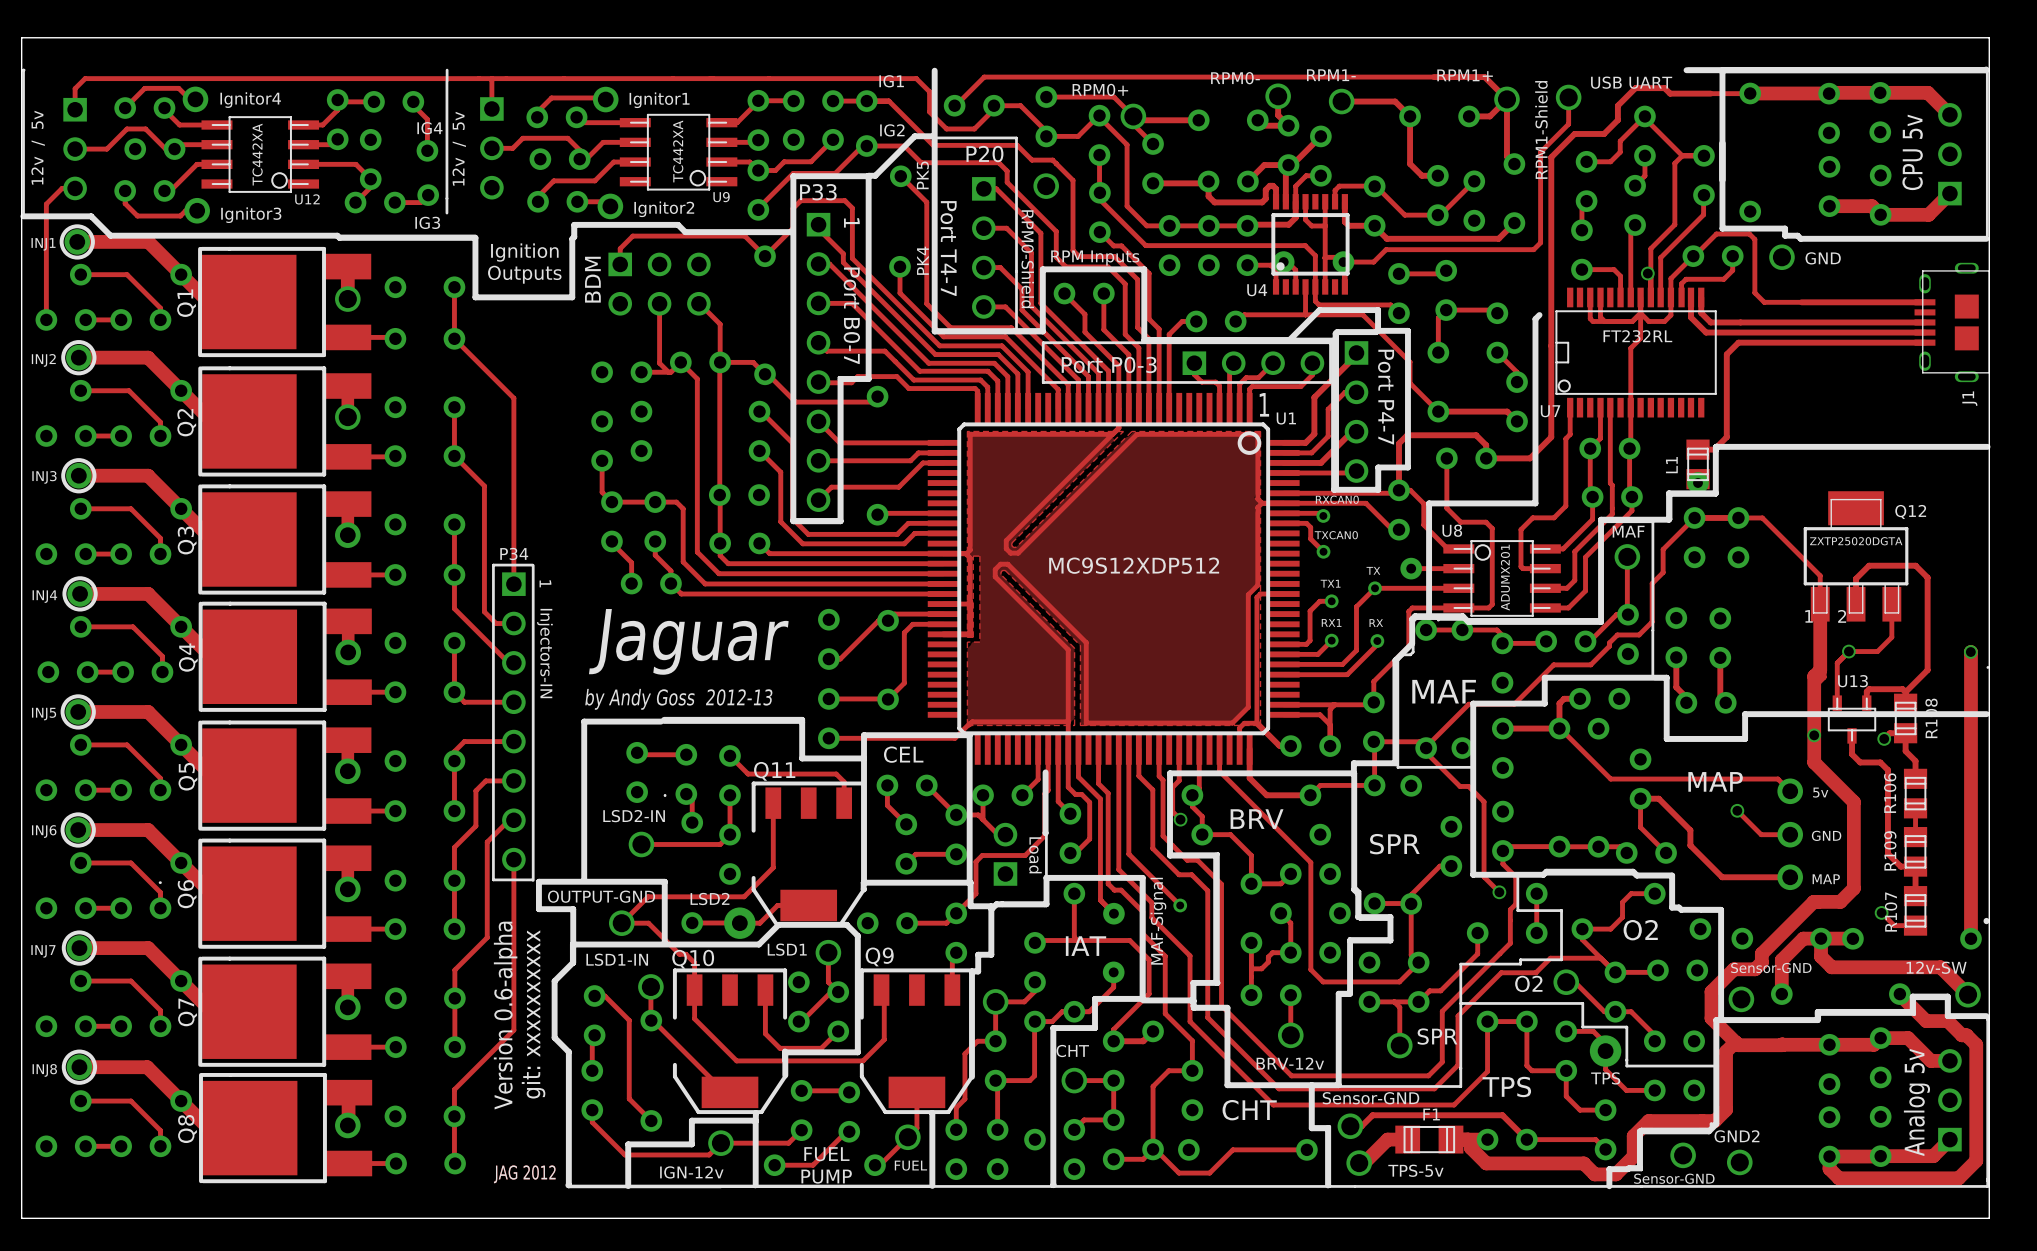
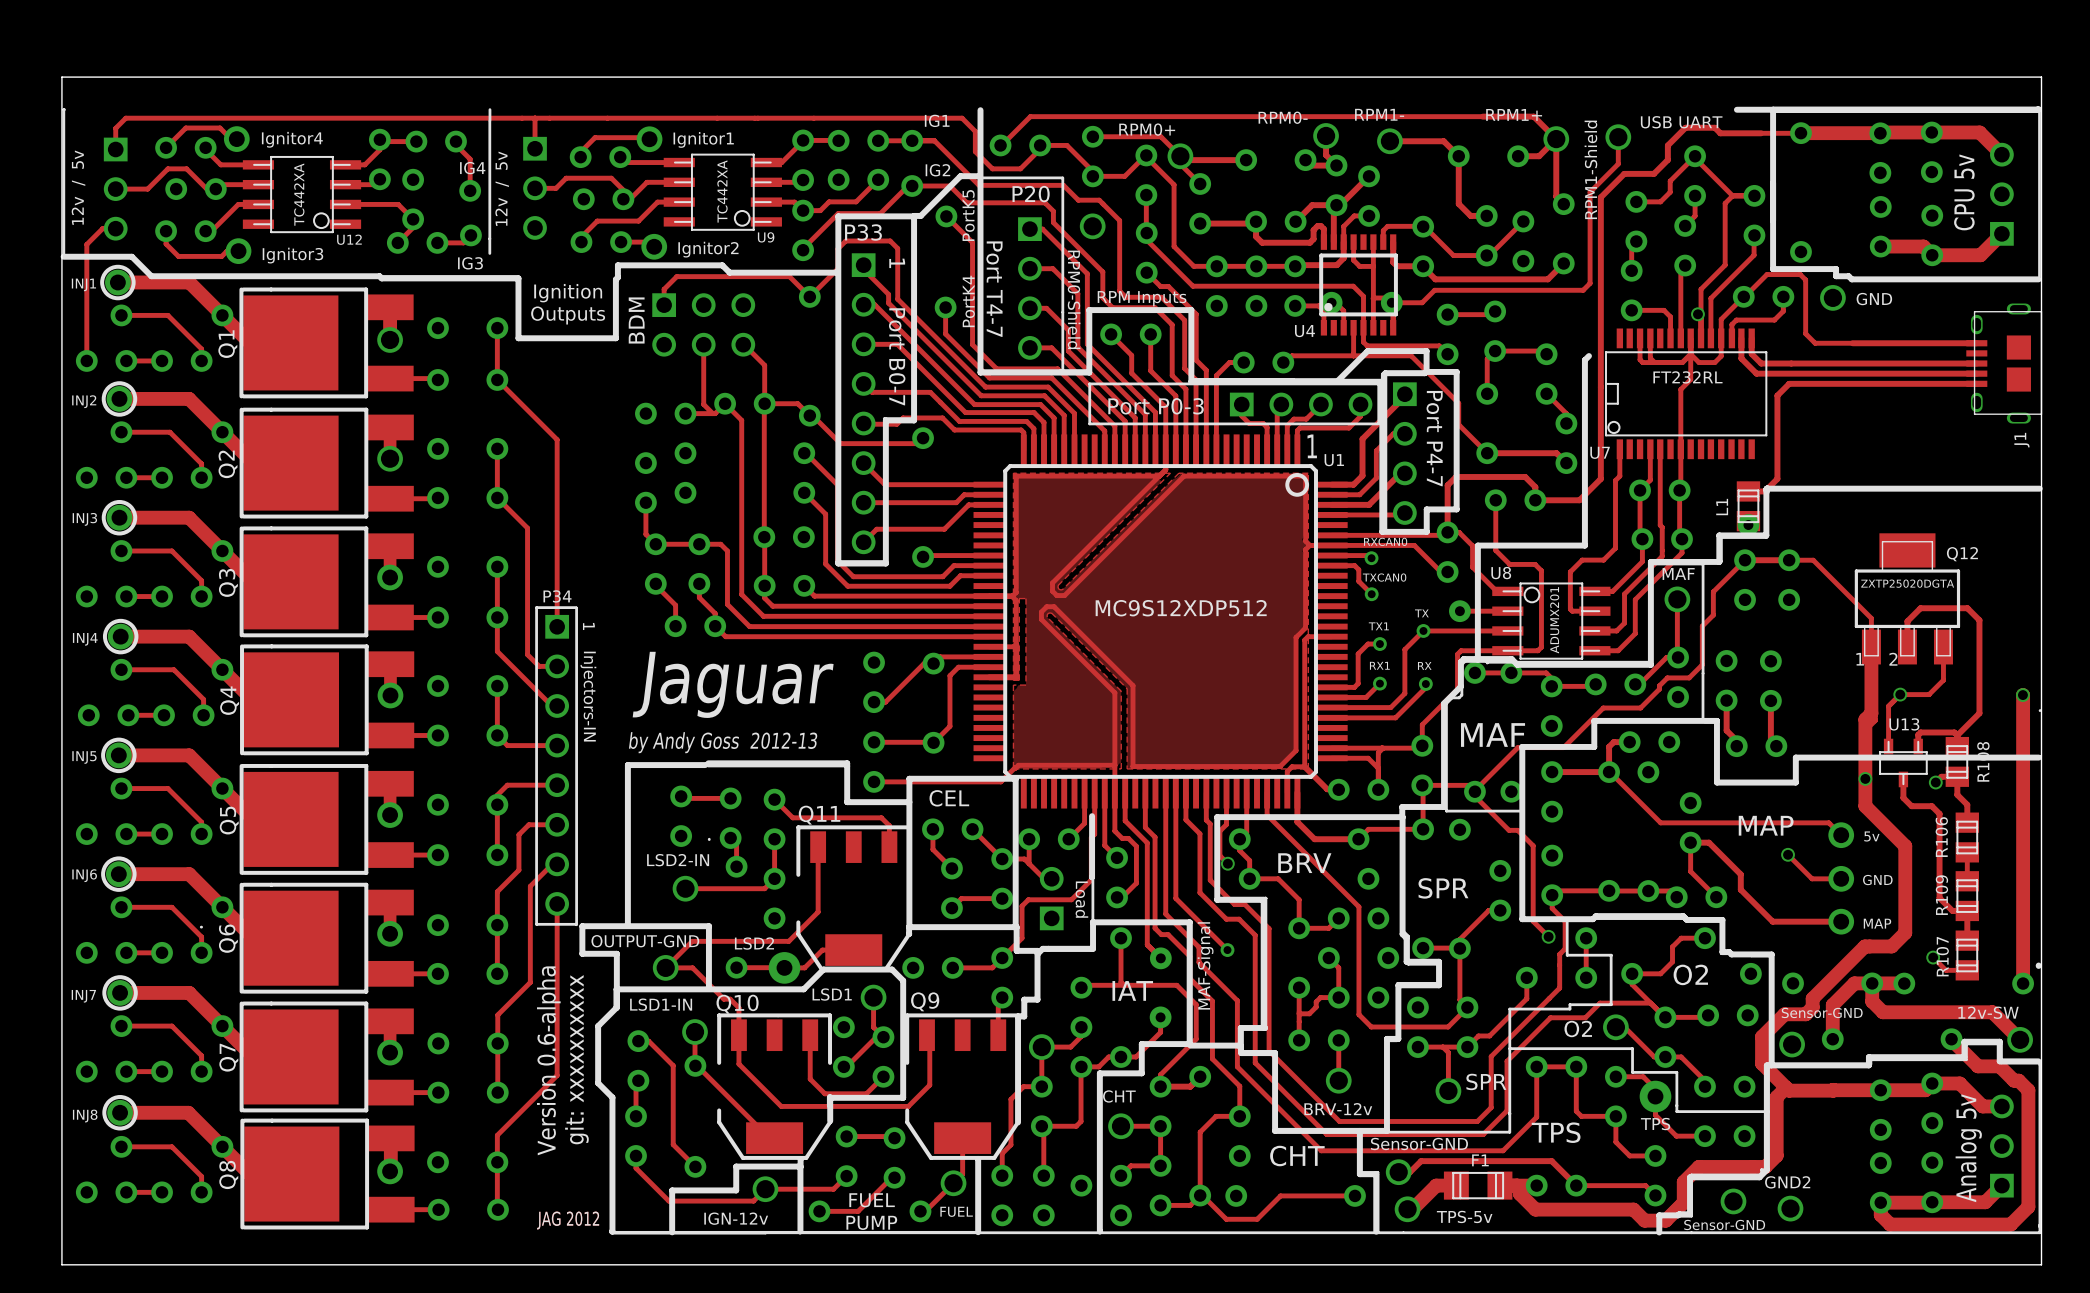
text: PK5 (922, 175) -> PortK5 (968, 215)
text: PK4 (922, 260) -> PortK4 (968, 301)

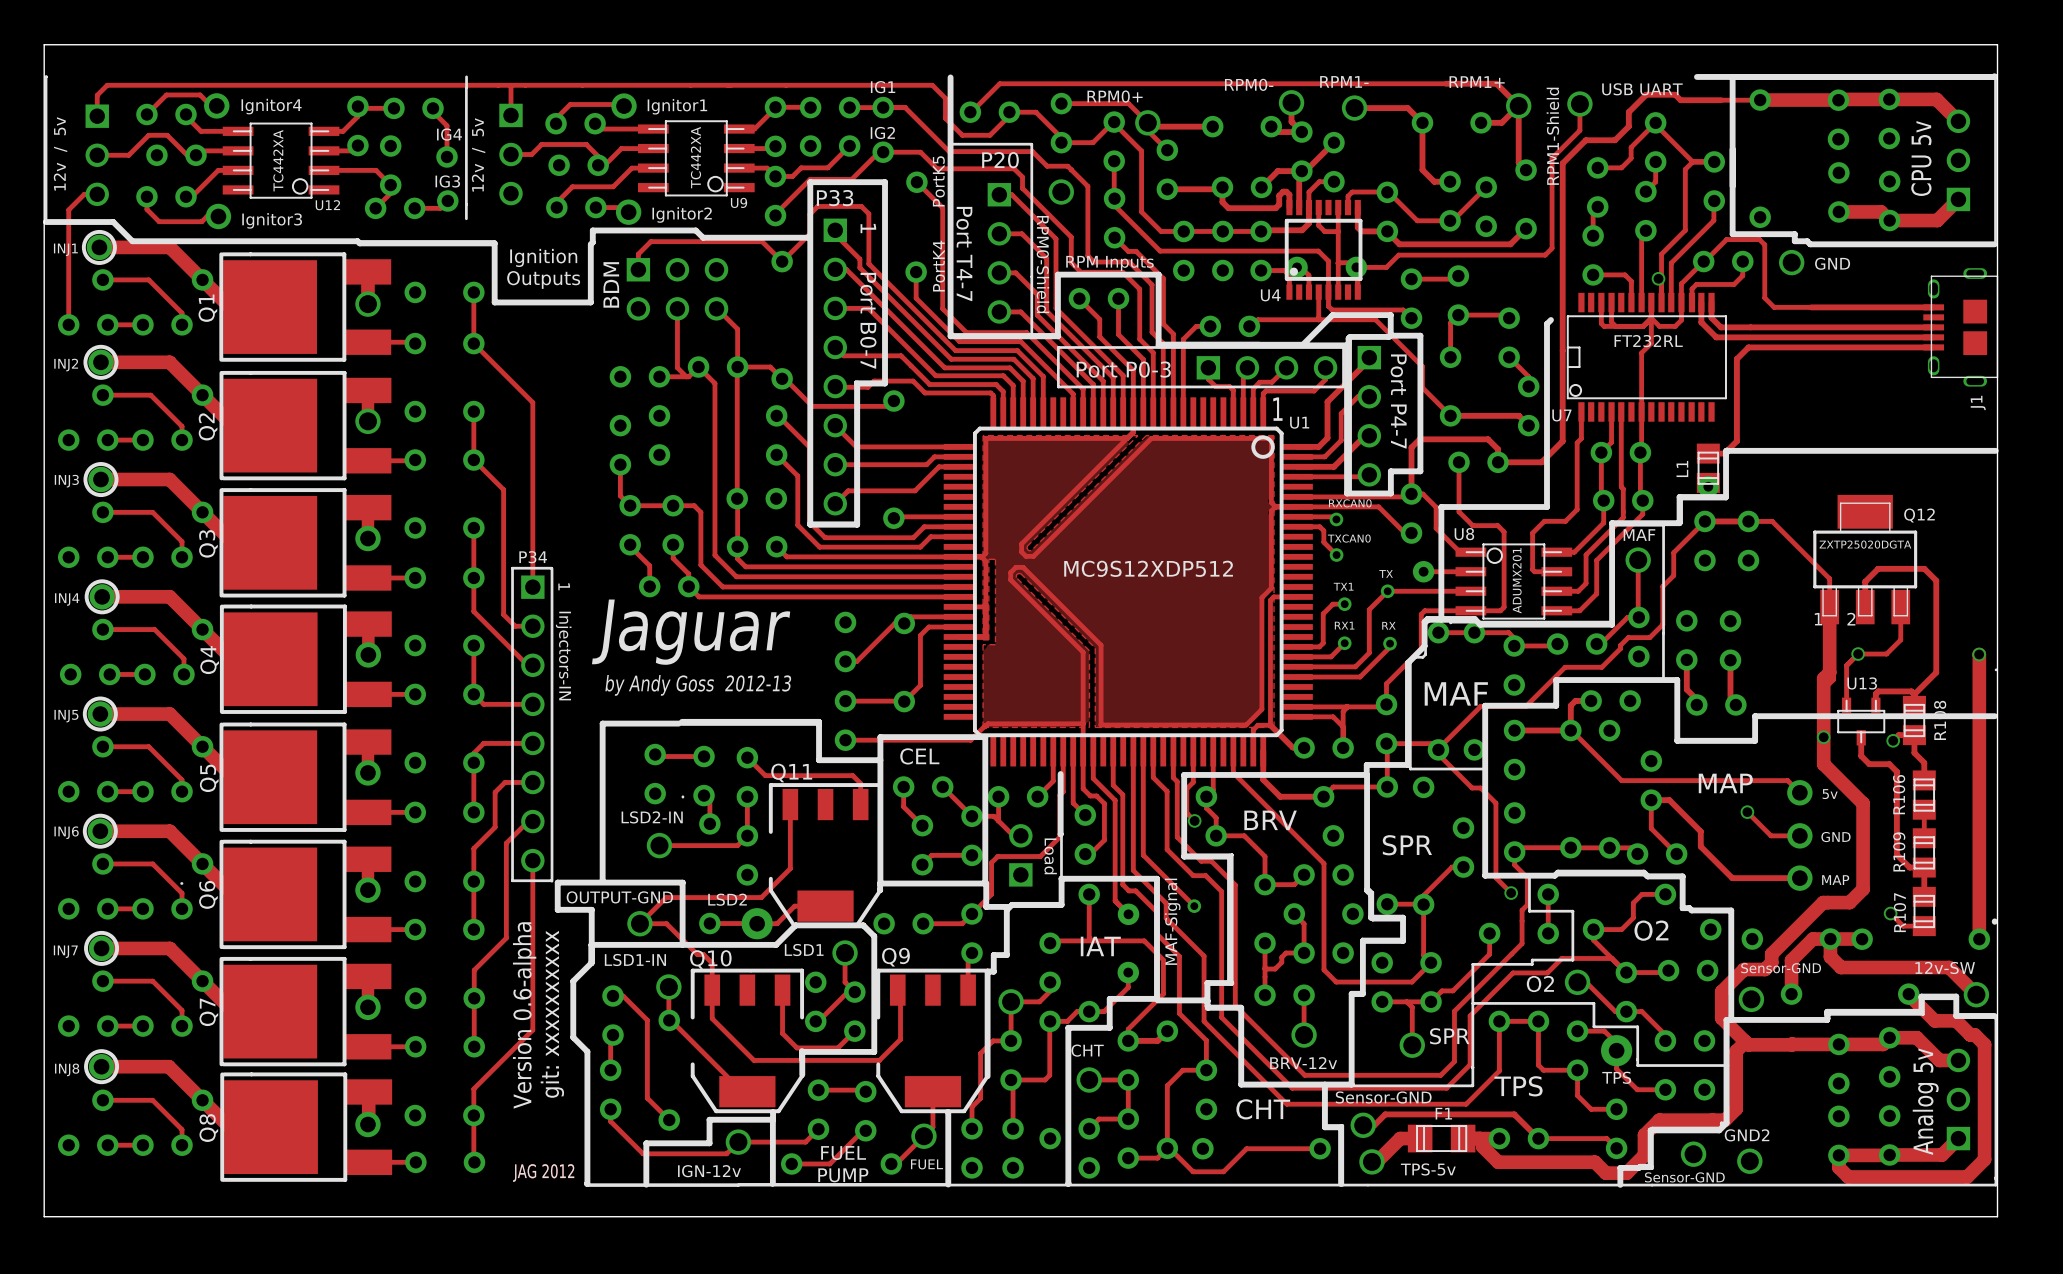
text position: IG1 (937, 120) -> IG1 (883, 87)
text position: IG2 (937, 170) -> IG2 (882, 132)
line: (978, 176) (960, 176) (920, 215) (913, 216) -> none
text position: IG3 (470, 263) -> IG3 (447, 181)
text position: Jaguar (733, 684) -> Jaguar (691, 632)
text position: by Andy Goss 2012-13 (723, 742) -> by Andy Goss 2012-13 (698, 685)

